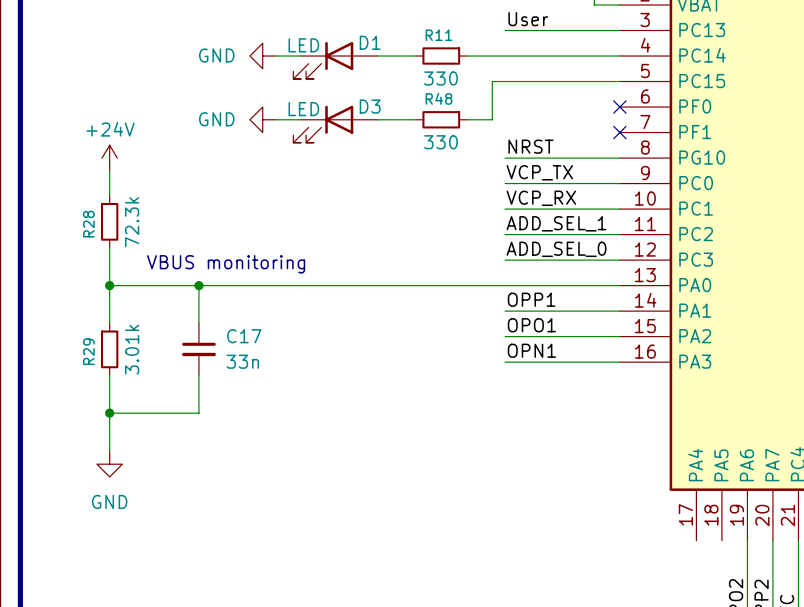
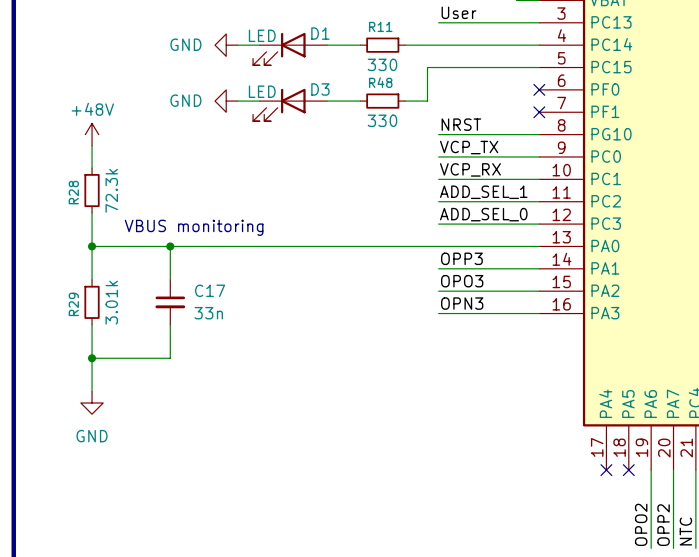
power symbol: +24V (109, 158) -> +48V (92, 134)
label: OPP1 (531, 299) -> OPP3 (461, 258)
label: OPO1 (531, 325) -> OPO3 (462, 281)
label: OPN1 (531, 350) -> OPN3 (462, 303)
no-connect mark: none -> (606, 470)
no-connect mark: none -> (628, 470)

